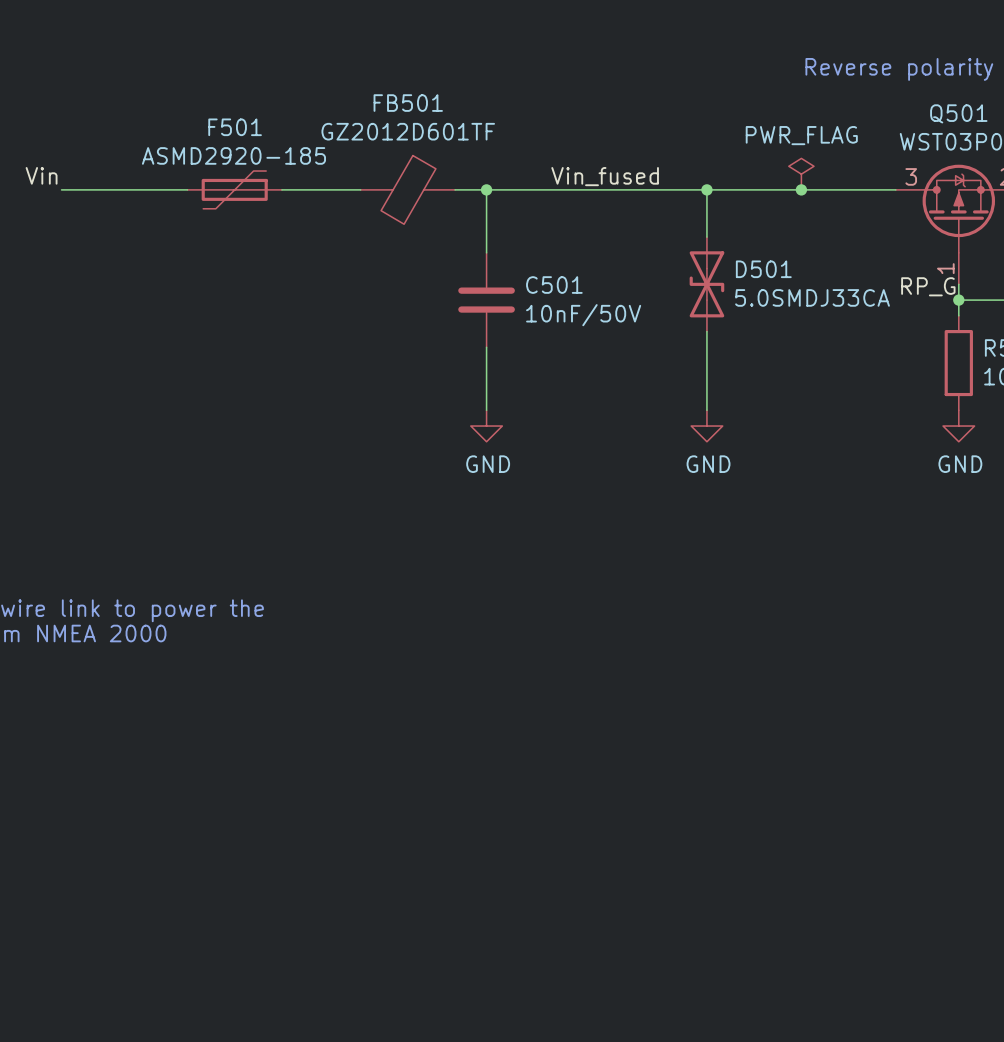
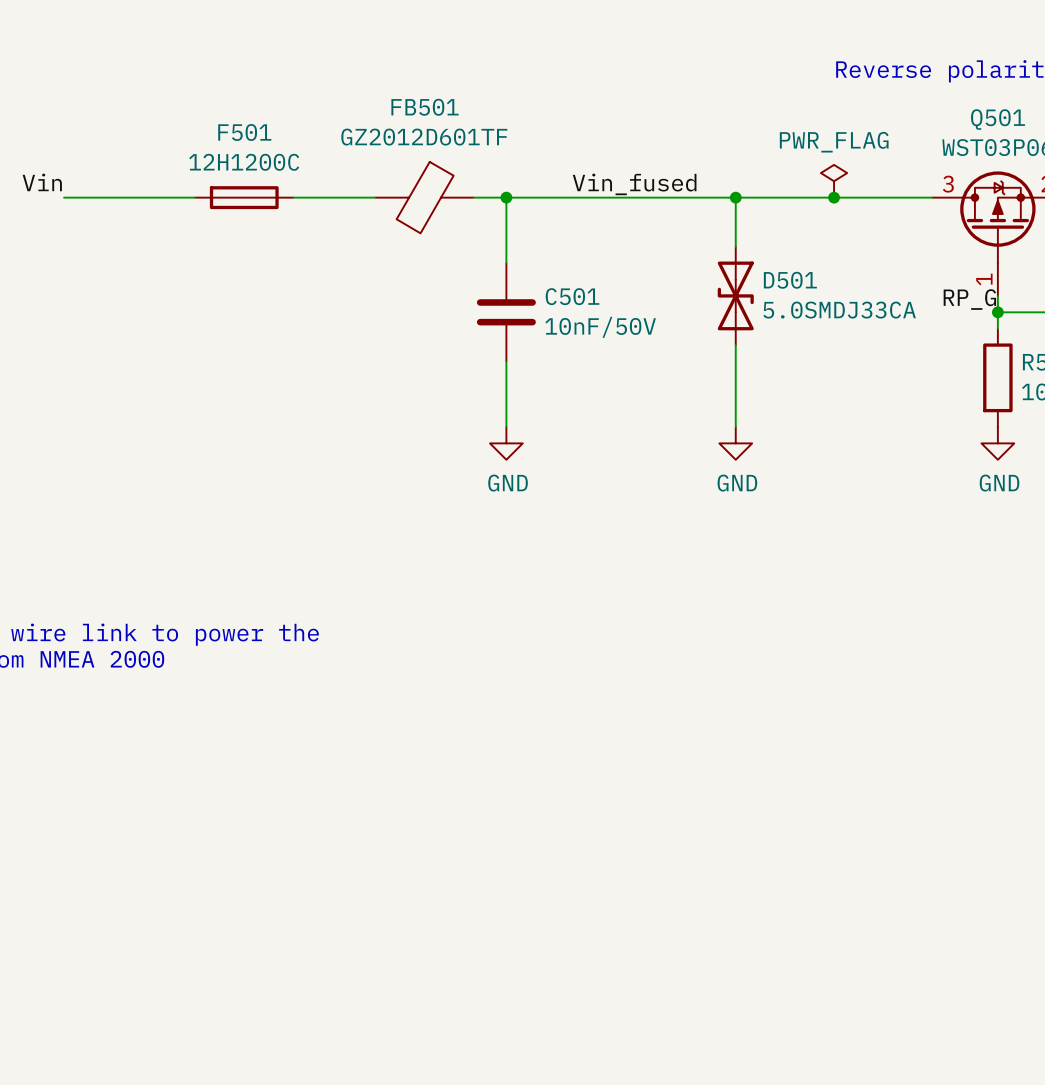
F501 value: ASMD2920-185 (233, 155) -> 12H1200C (244, 162)
F501 symbol: [187, 171, 282, 209] -> [195, 186, 294, 210]

